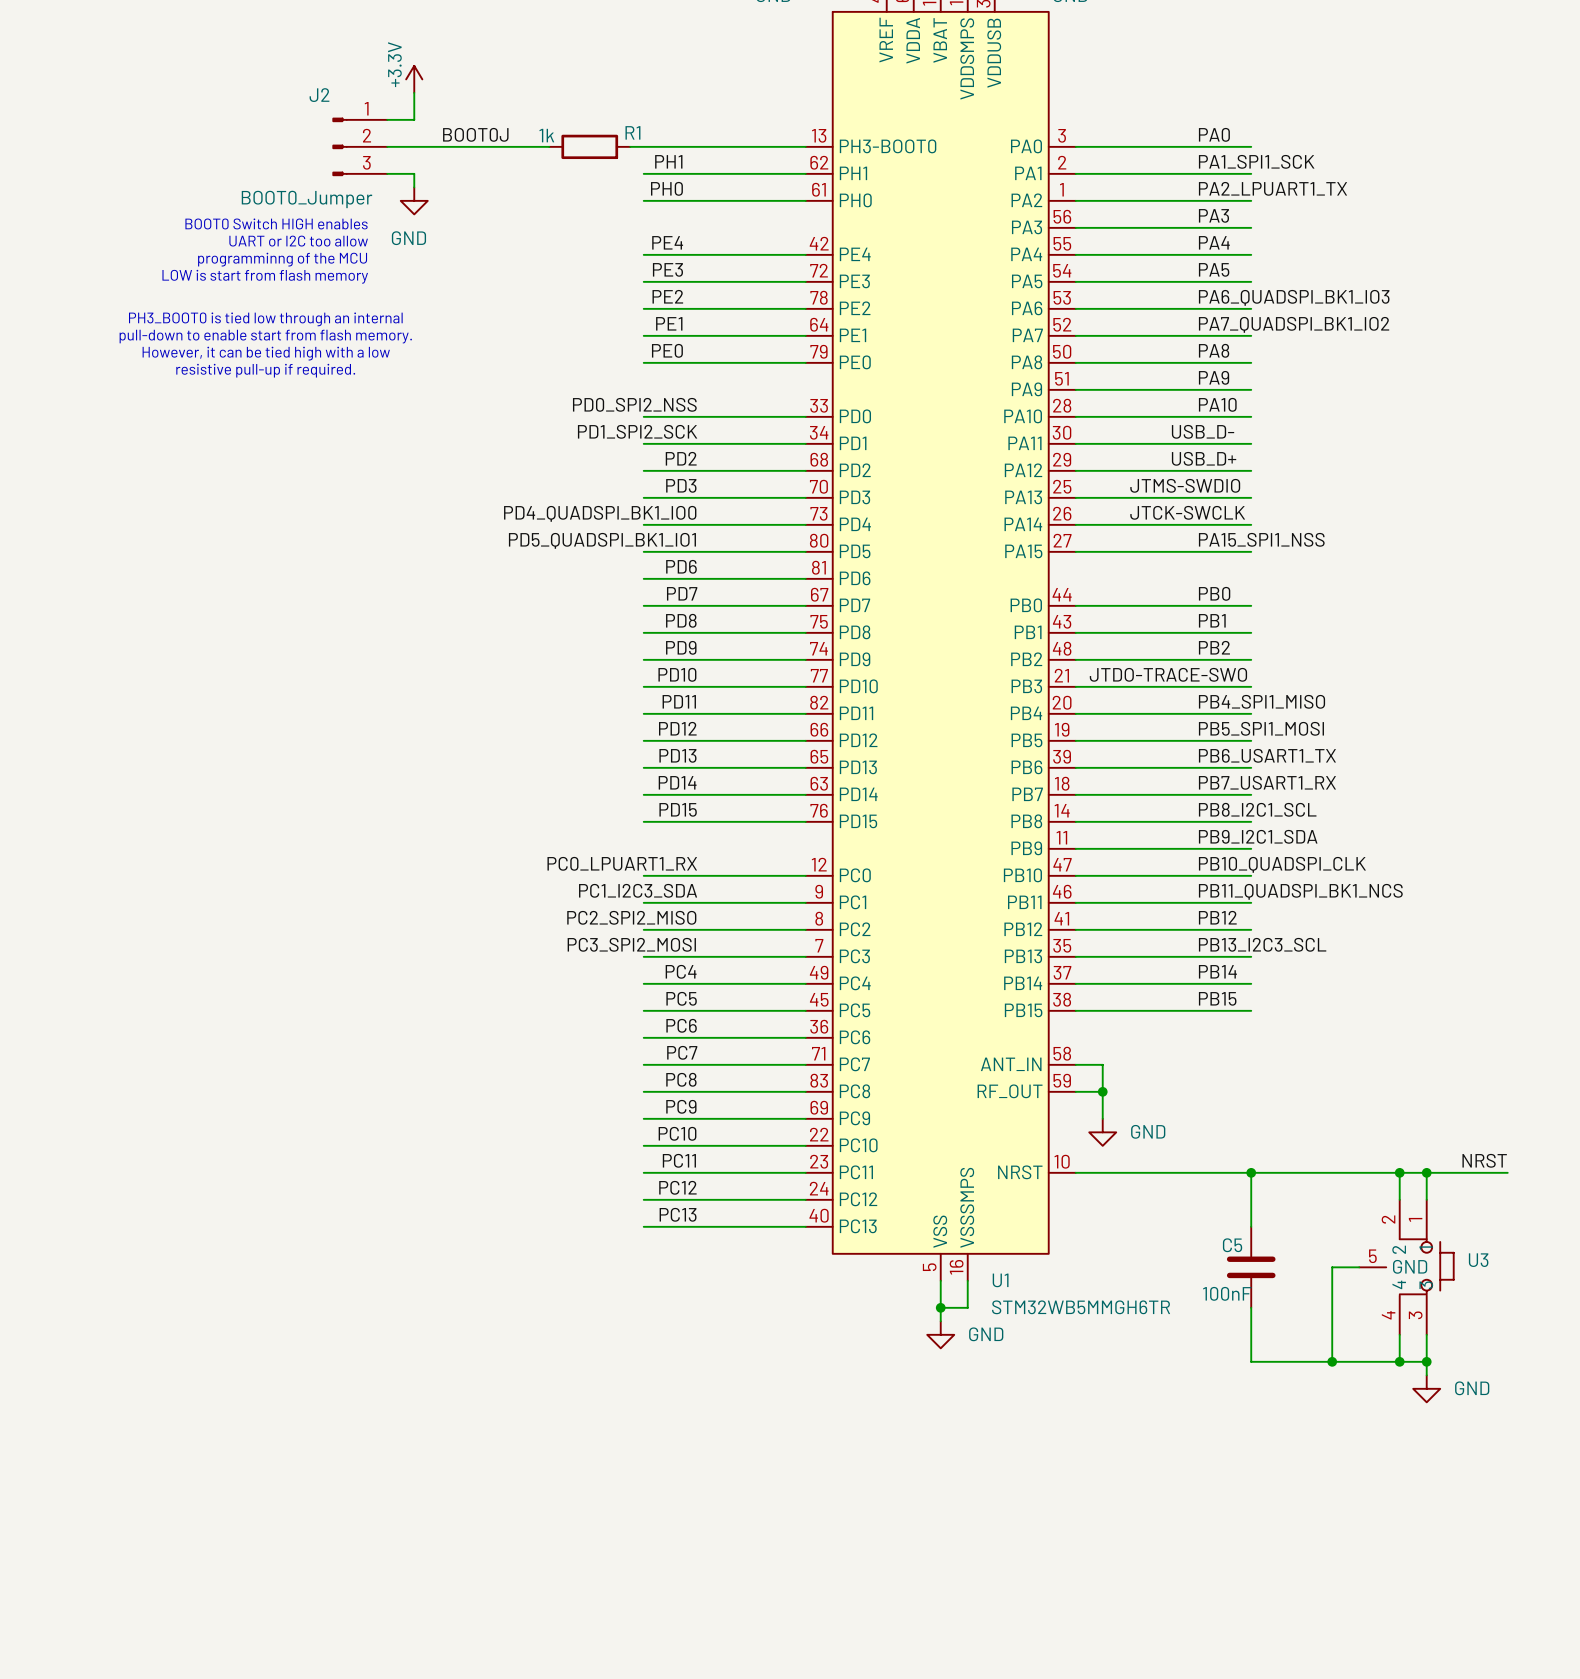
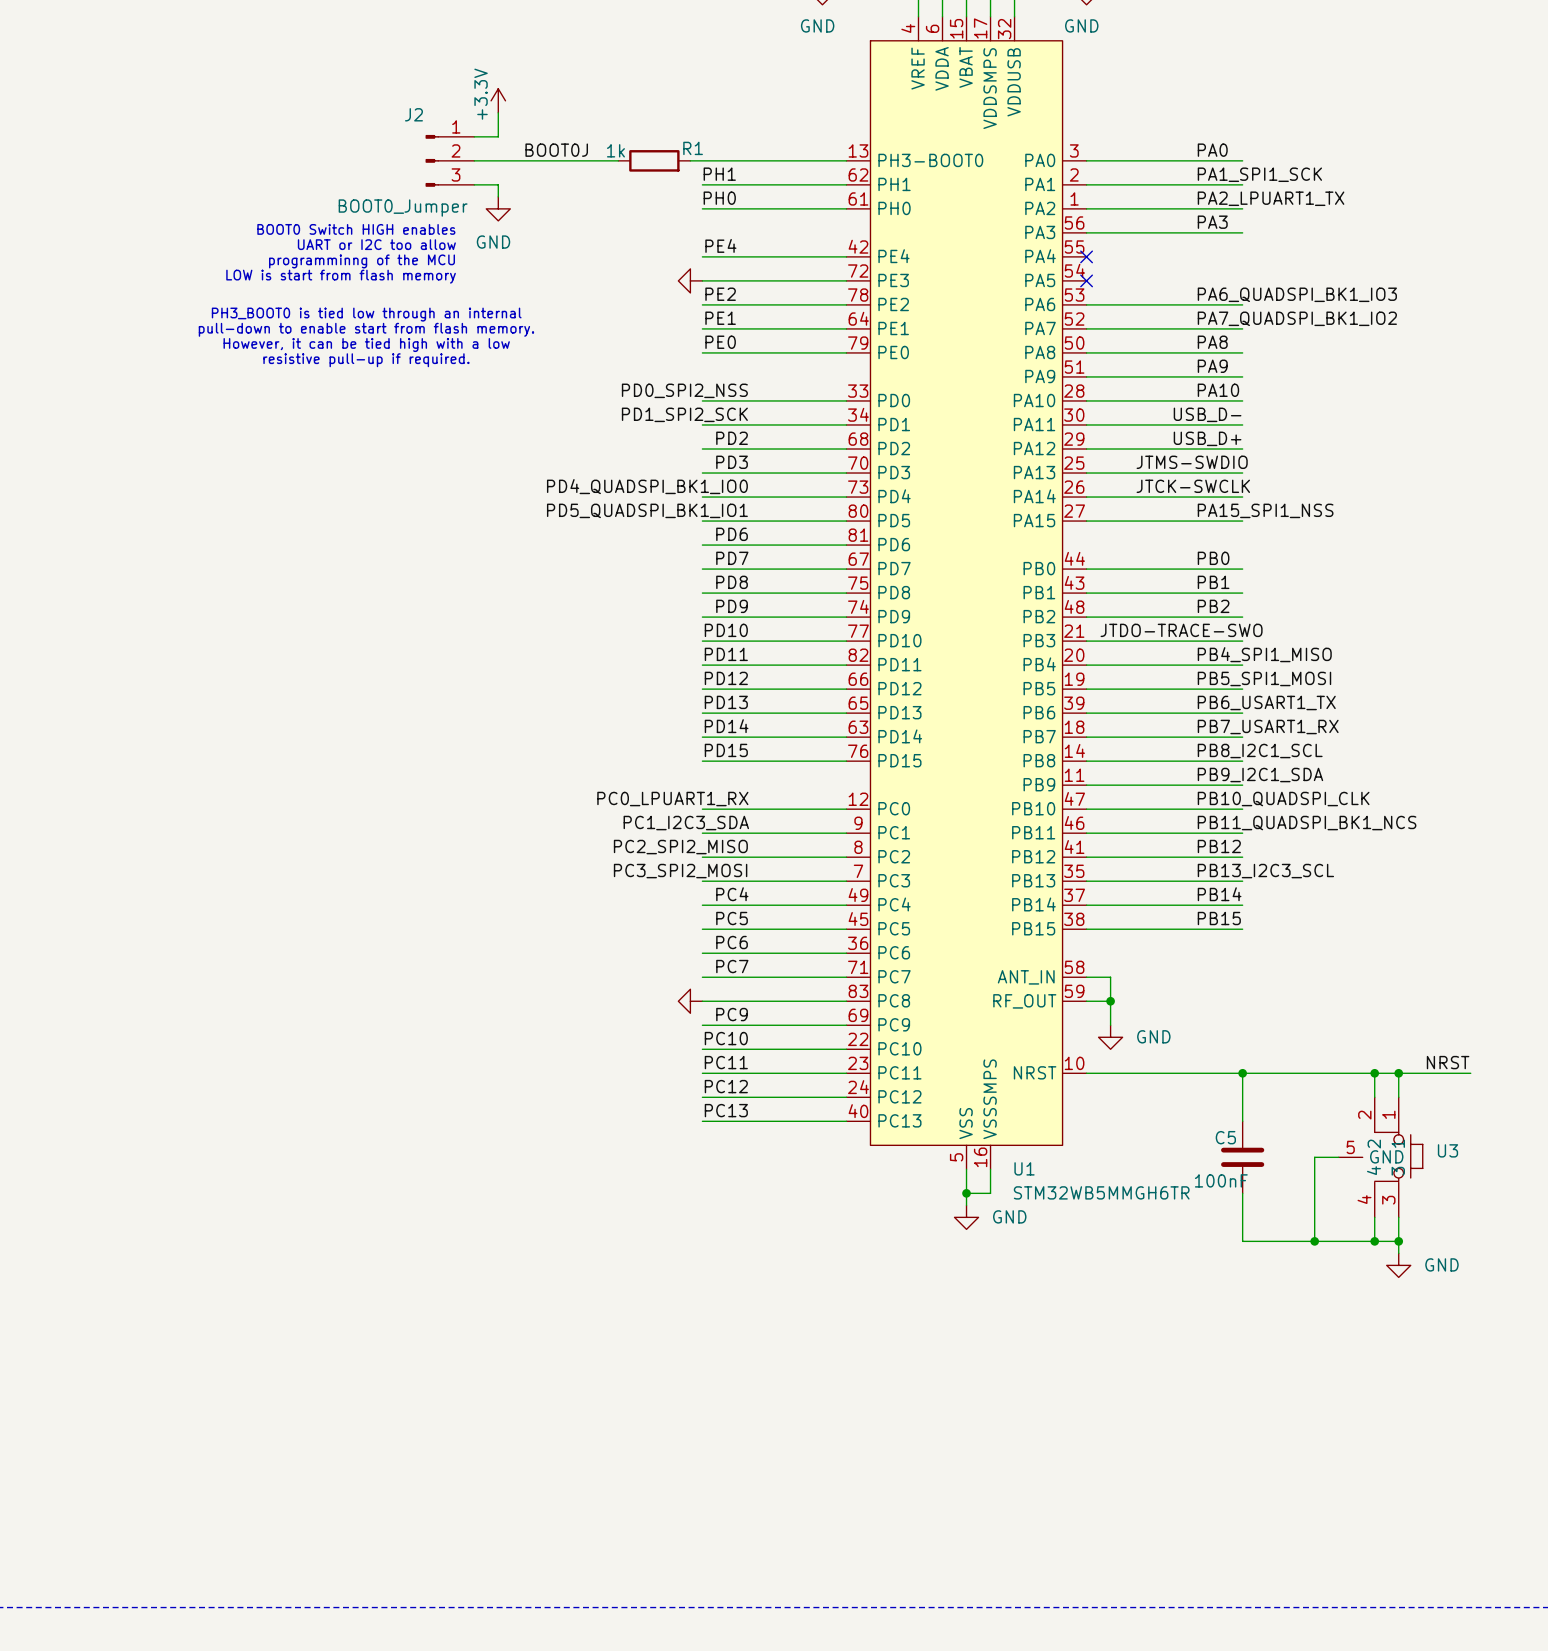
label: PA4 (1214, 242) -> none
wire: (1075, 254) (1251, 254) -> none
no-connect mark: none -> (1086, 256)
label: PE3 (667, 269) -> none
label: PA5 (1214, 269) -> none
power symbol: none -> (690, 280)
wire: (1075, 281) (1251, 281) -> none
no-connect mark: none -> (1086, 280)
label: PC8 (681, 1079) -> none
power symbol: none -> (690, 1001)

